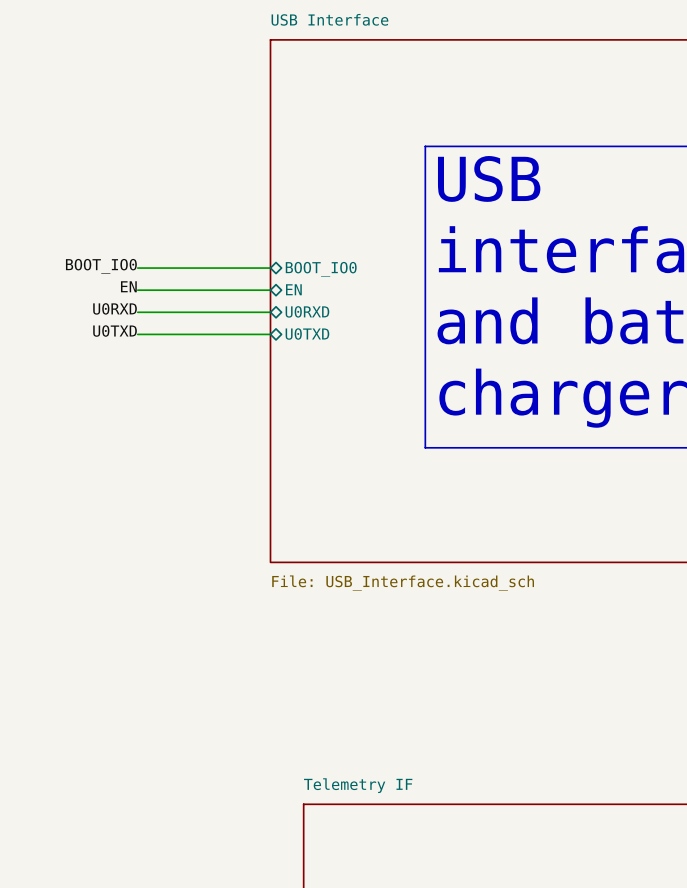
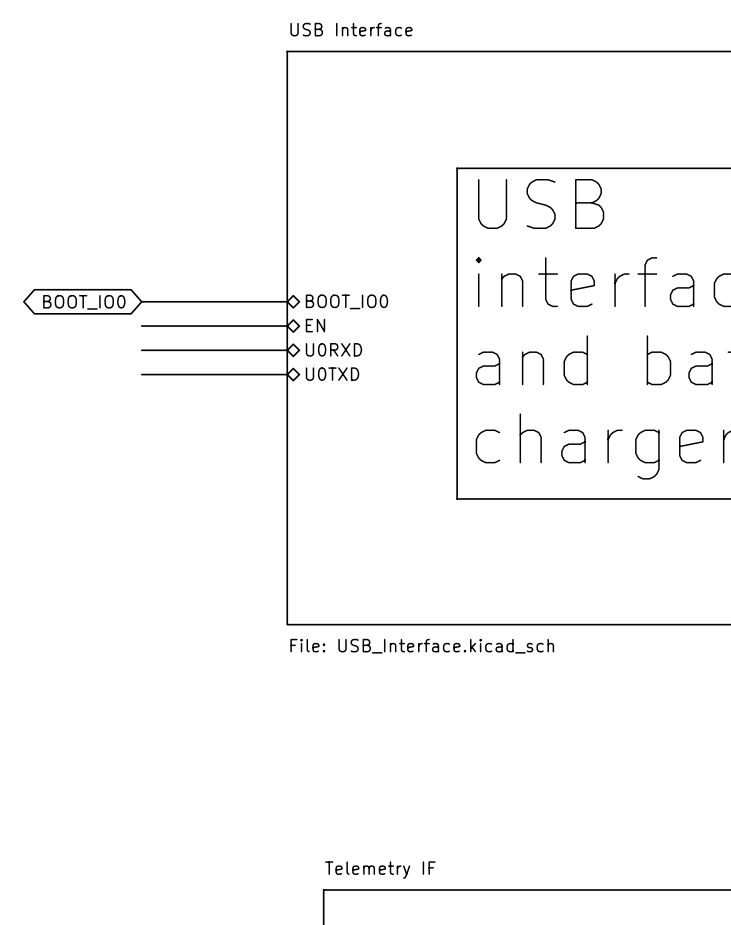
label: BOOT_IO0 (101, 266) -> none
global label: none -> BOOT_IO0 (84, 302)
label: EN (128, 286) -> none
label: U0RXD (115, 308) -> none
label: U0TXD (115, 331) -> none

